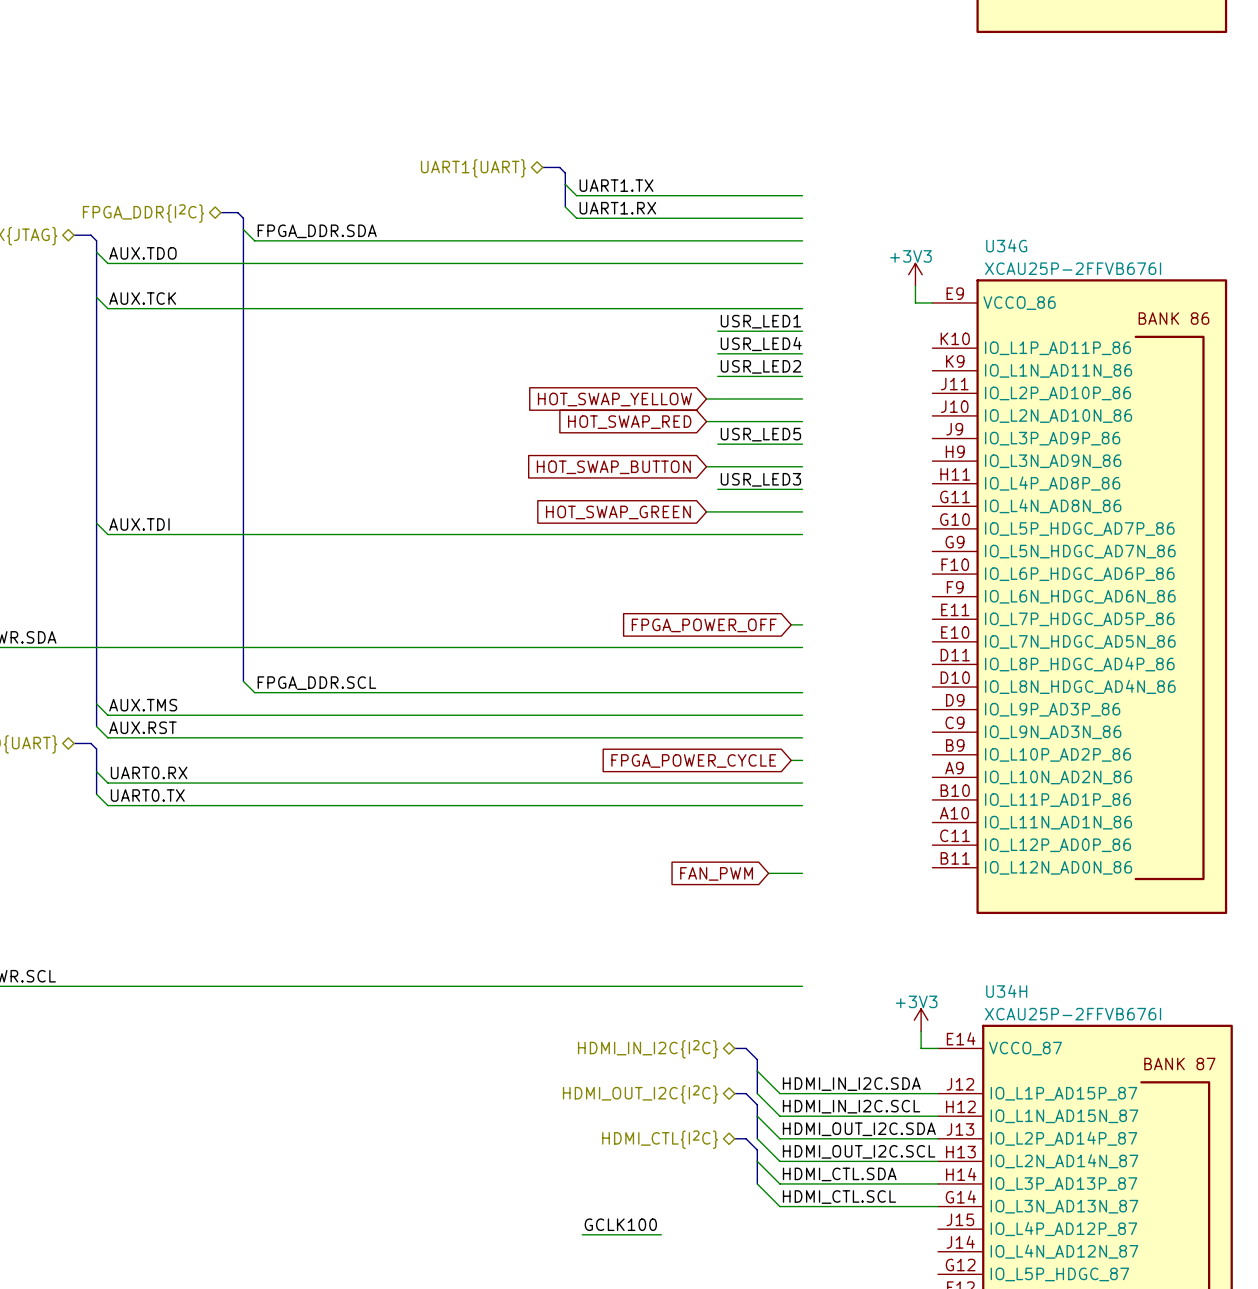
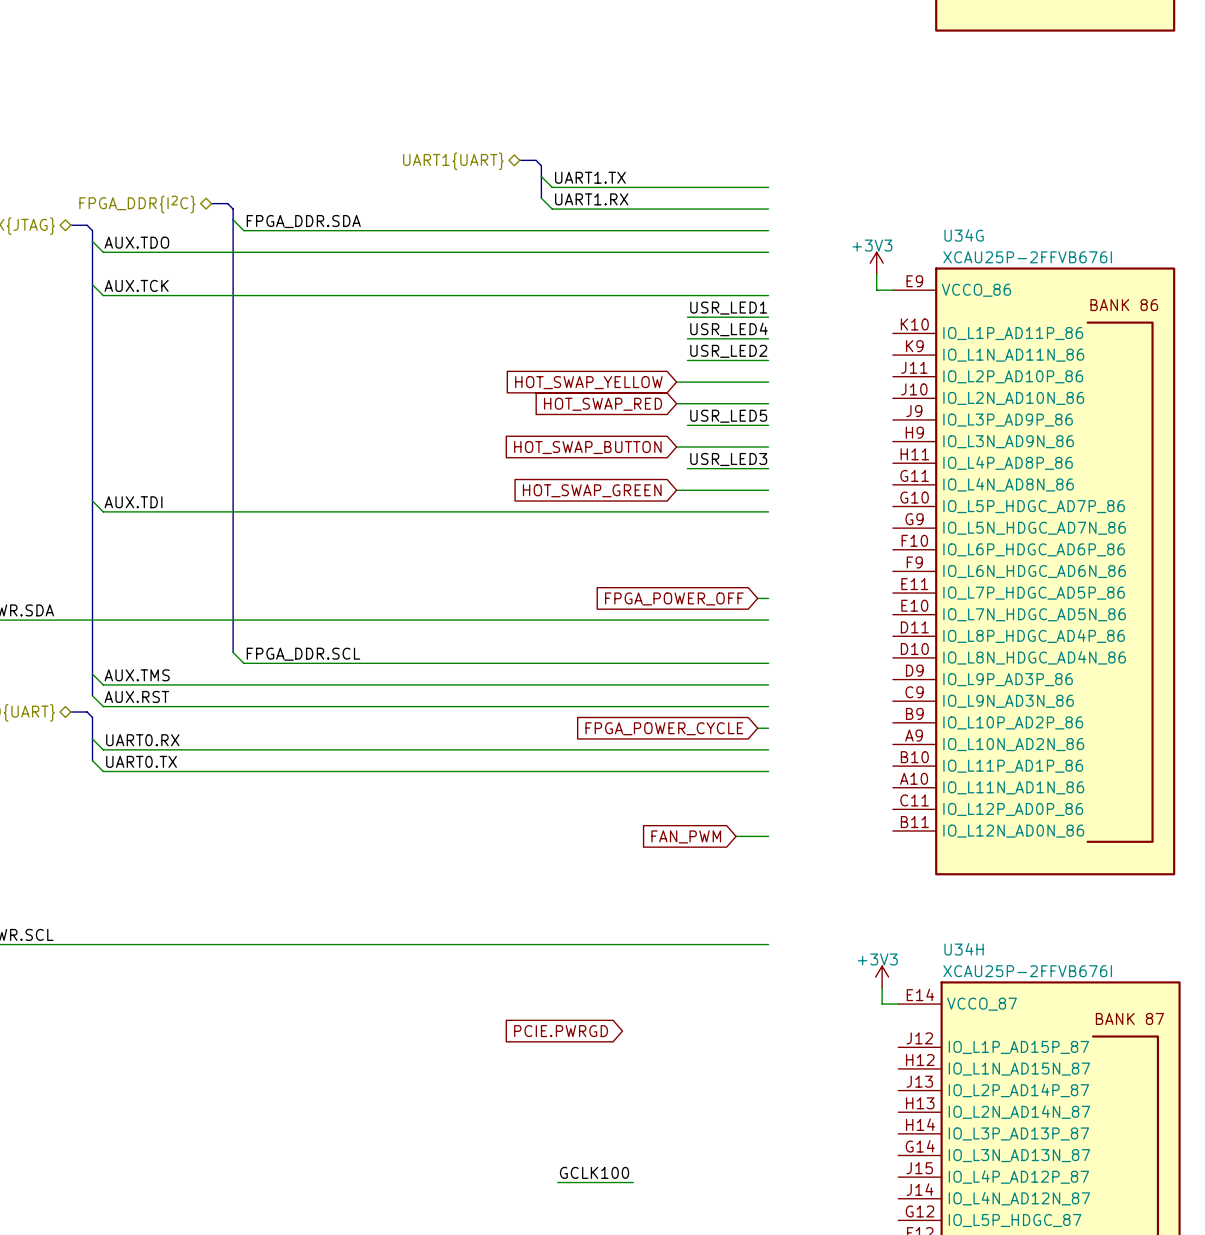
bus: (734, 1048) (746, 1048) (757, 1059) (757, 1093) -> none
hierarchical label: HDMI_IN_I2C{I2C} (647, 1049) -> none
wire: (757, 1071) (779, 1093) (938, 1093) -> none
global label: none -> PCIE.PWRGD (561, 1031)
label: HDMI_IN_I2C.SDA (851, 1084) -> none
bus: (734, 1093) (746, 1093) (757, 1104) (757, 1138) -> none
wire: (757, 1093) (779, 1116) (938, 1116) -> none
hierarchical label: HDMI_OUT_I2C{I2C} (640, 1094) -> none
label: HDMI_IN_I2C.SCL (851, 1106) -> none
wire: (757, 1116) (779, 1138) (938, 1138) -> none
label: HDMI_OUT_I2C.SDA (859, 1129) -> none
bus: (734, 1138) (746, 1138) (757, 1150) (757, 1183) -> none
wire: (757, 1138) (779, 1161) (938, 1161) -> none
hierarchical label: HDMI_CTL{I2C} (660, 1139) -> none
label: HDMI_OUT_I2C.SCL (859, 1151) -> none
wire: (757, 1161) (779, 1183) (938, 1183) -> none
label: HDMI_CTL.SDA (839, 1174) -> none
wire: (757, 1183) (779, 1206) (938, 1206) -> none
label: HDMI_CTL.SCL (839, 1197) -> none

